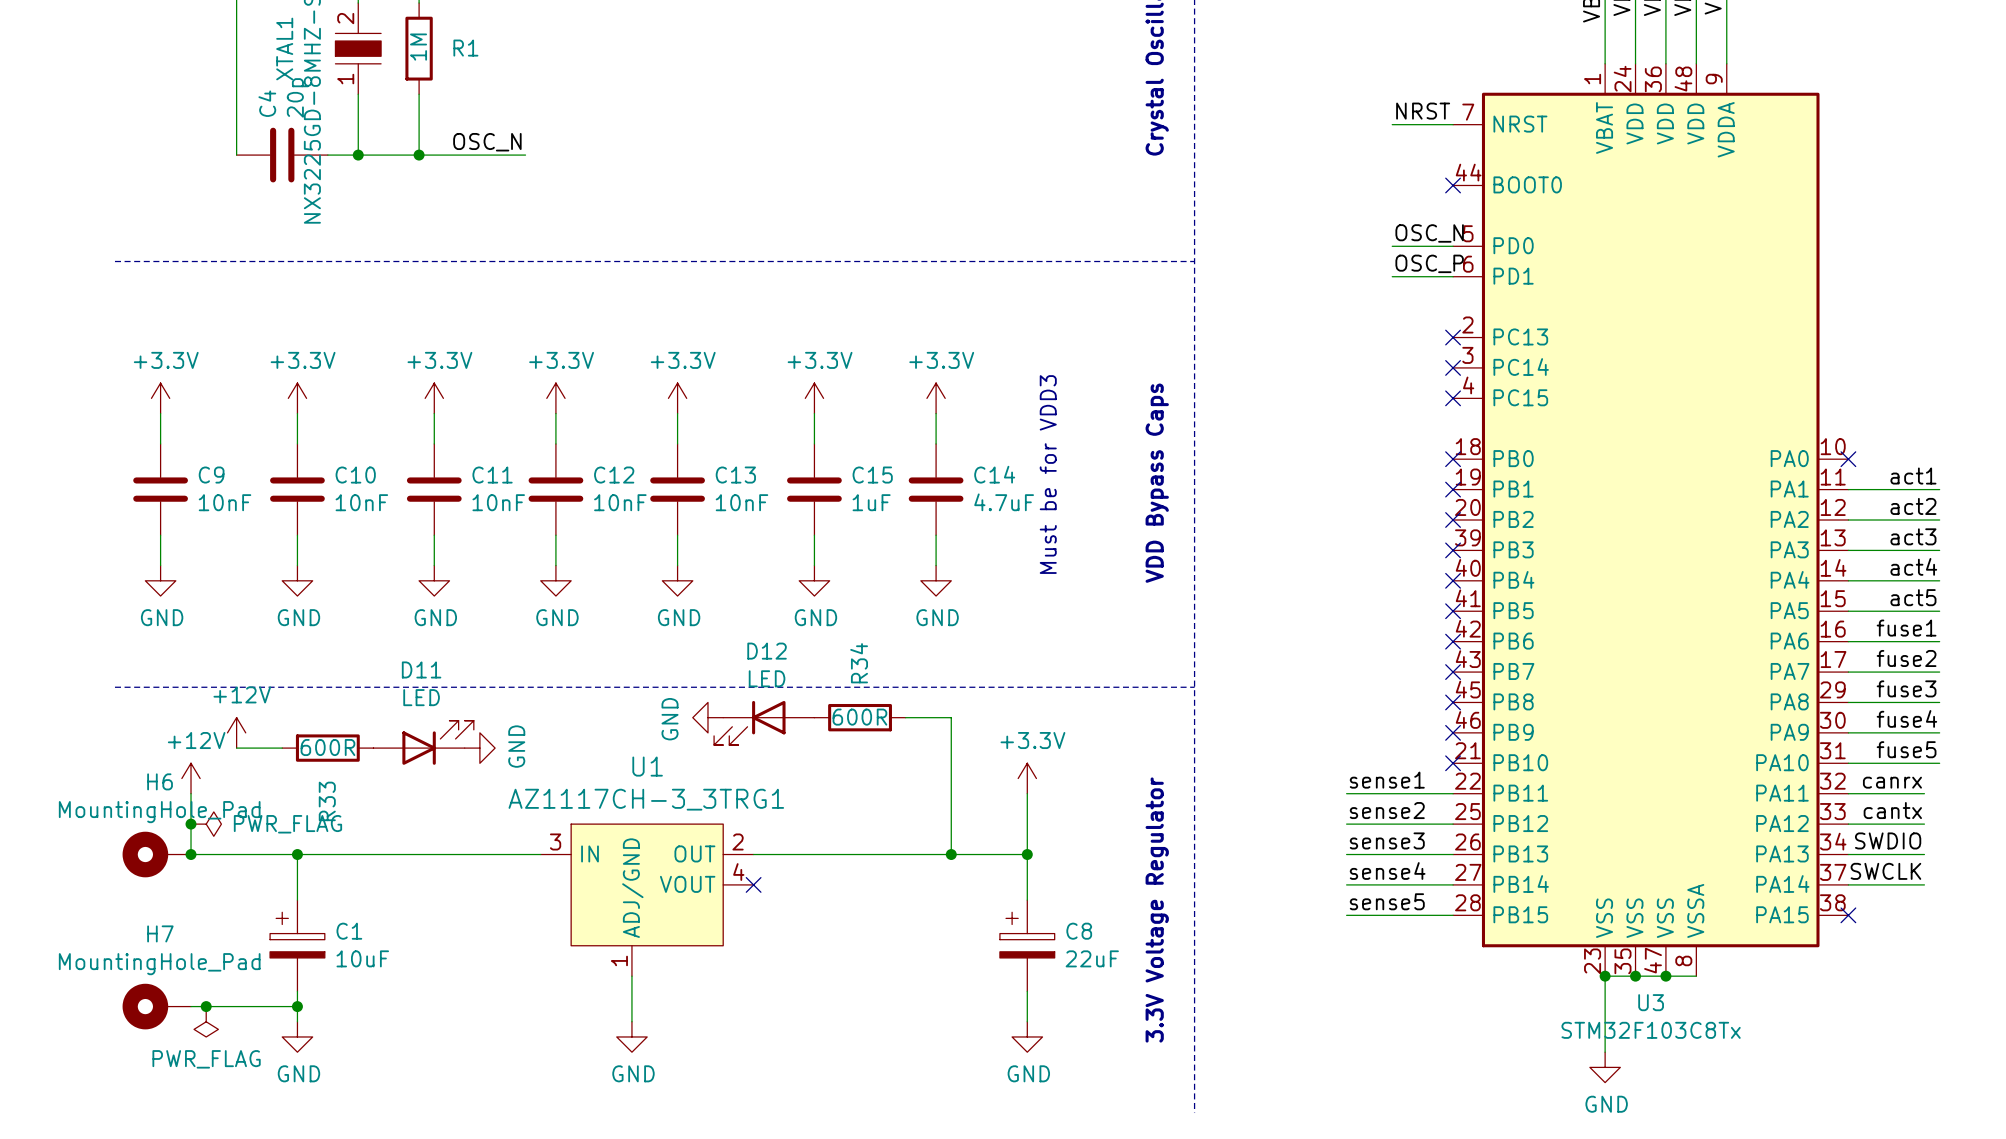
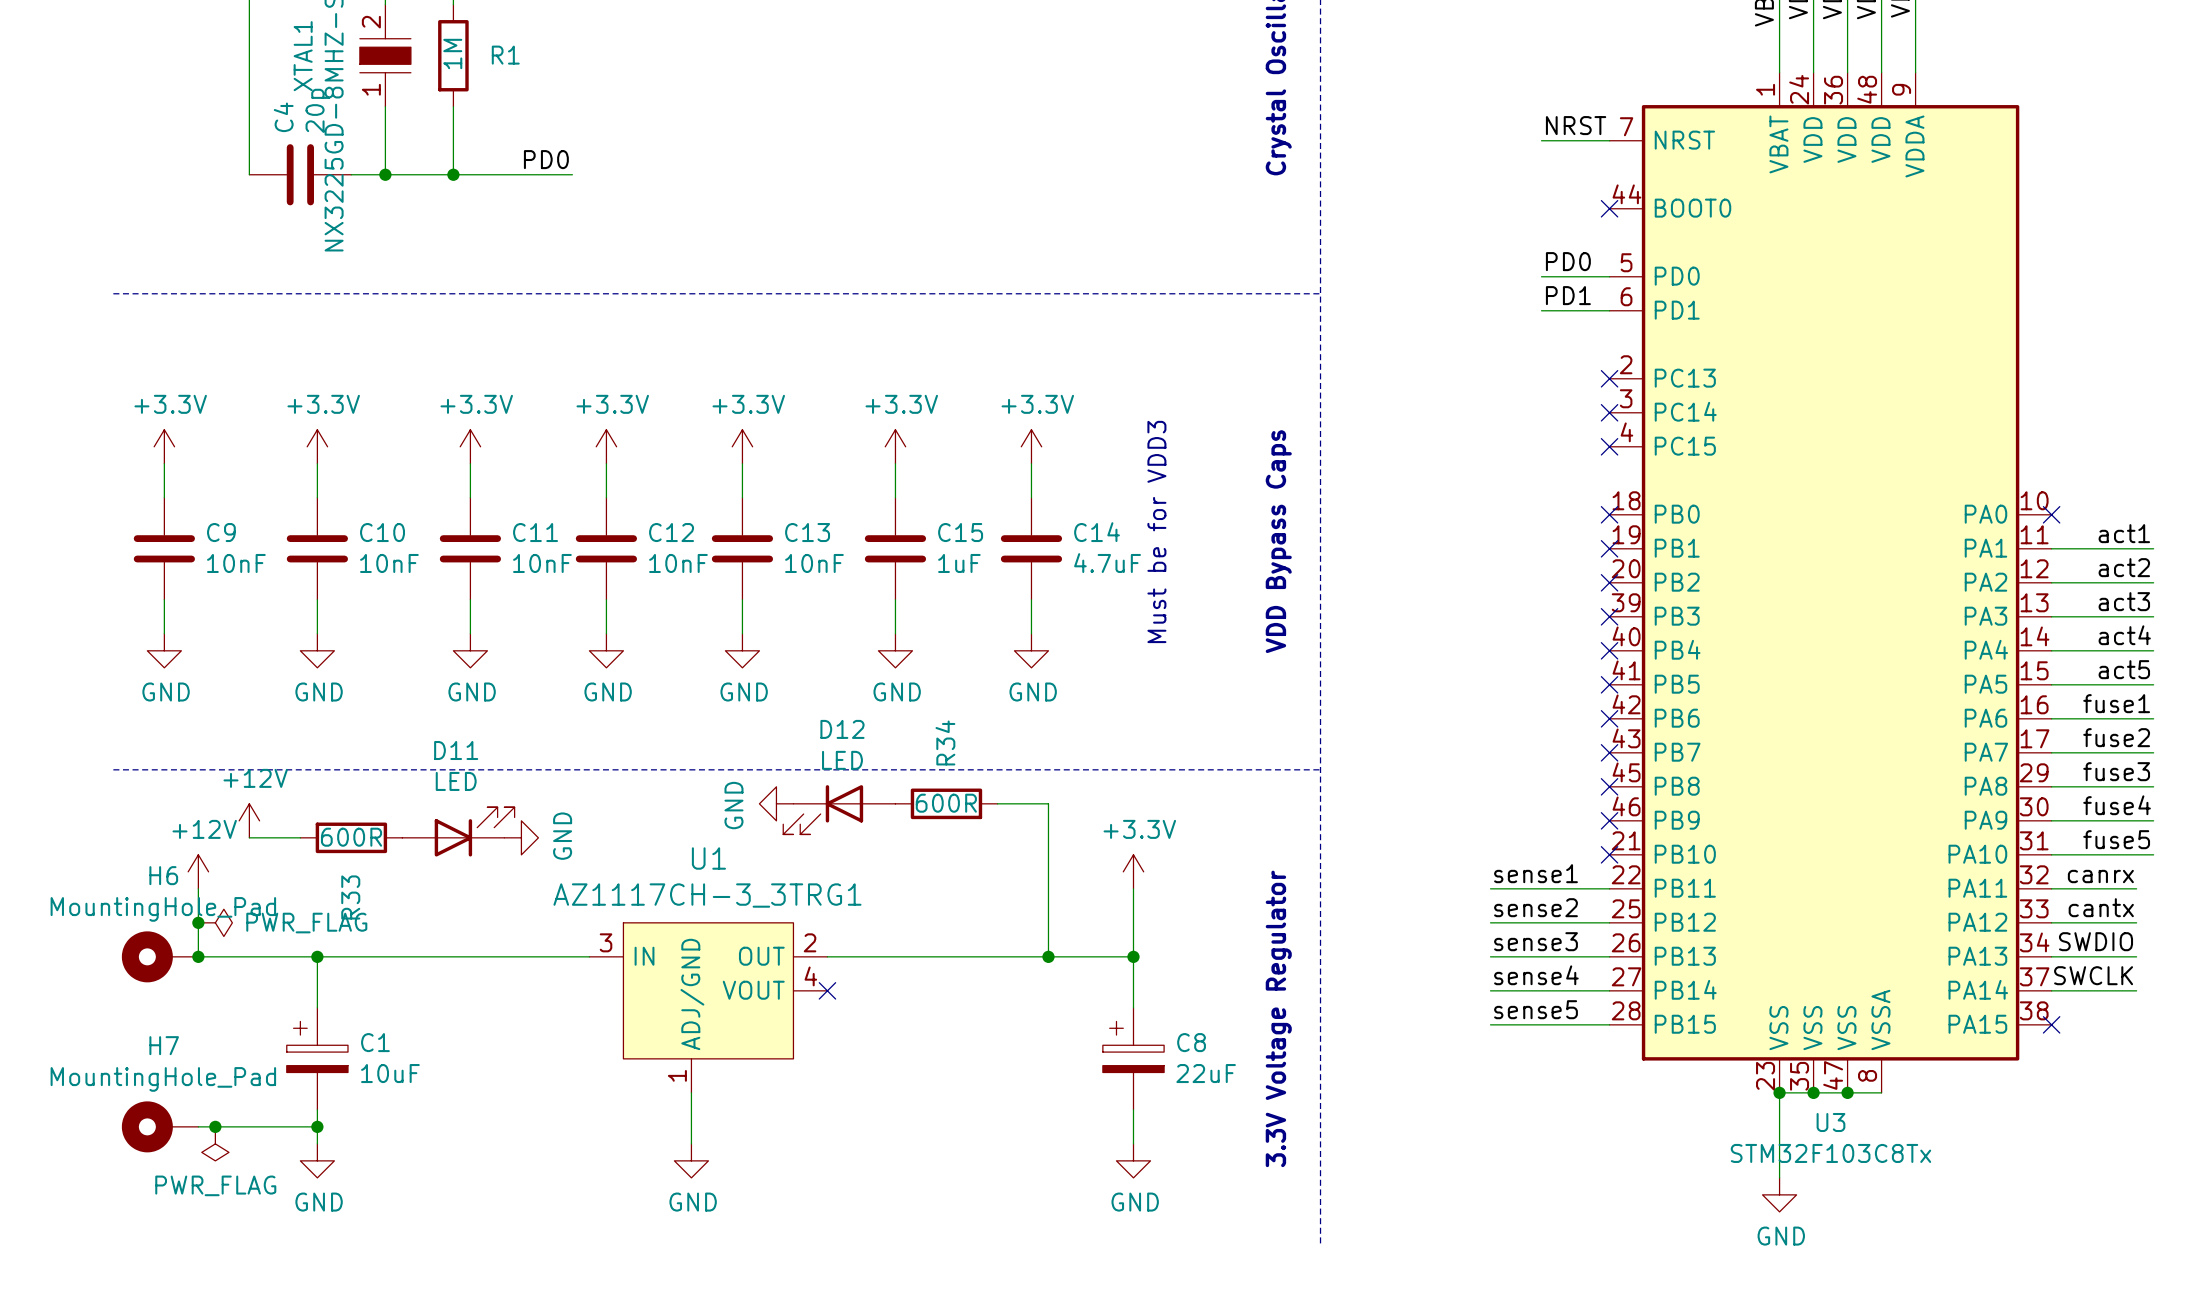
label: OSC_N (487, 142) -> PD0 (546, 159)
label: OSC_N (1429, 233) -> PD0 (1568, 261)
label: OSC_P (1429, 263) -> PD1 (1568, 295)

